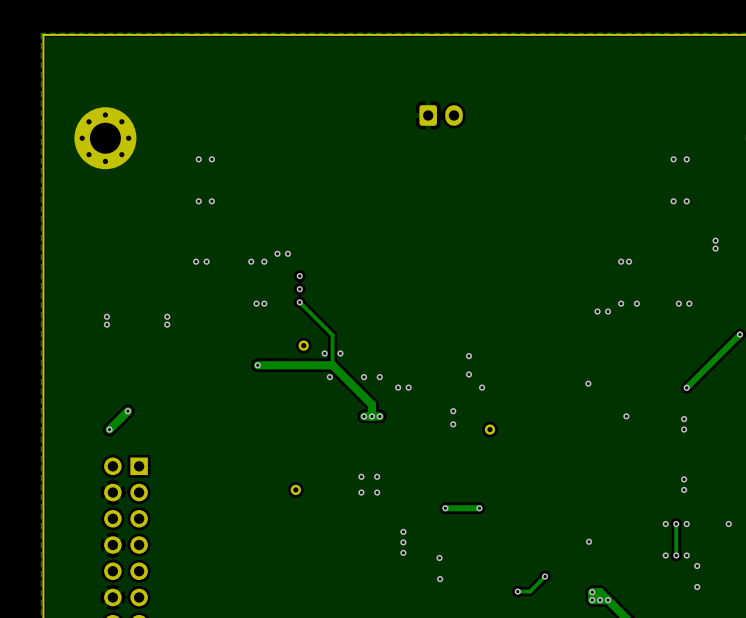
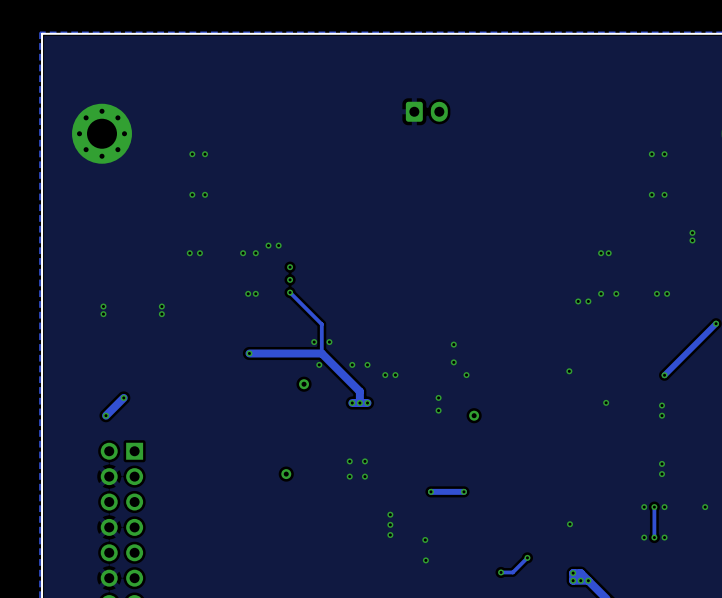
part position: (303, 345) -> (304, 384)
via: (697, 566) -> none
via: (697, 586) -> none

